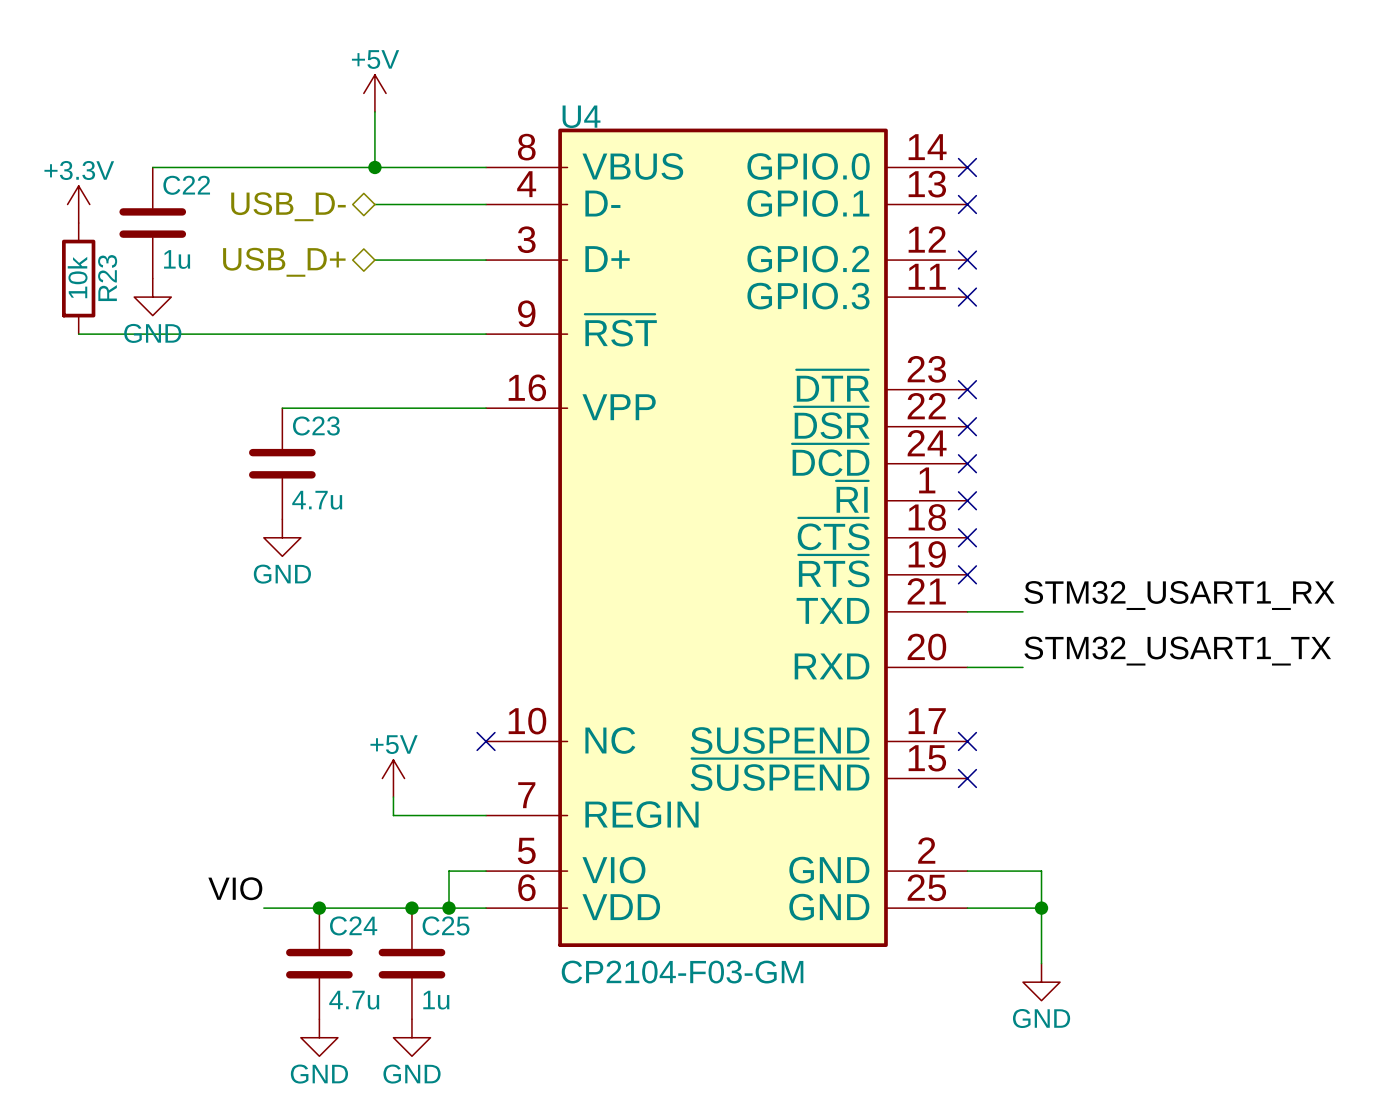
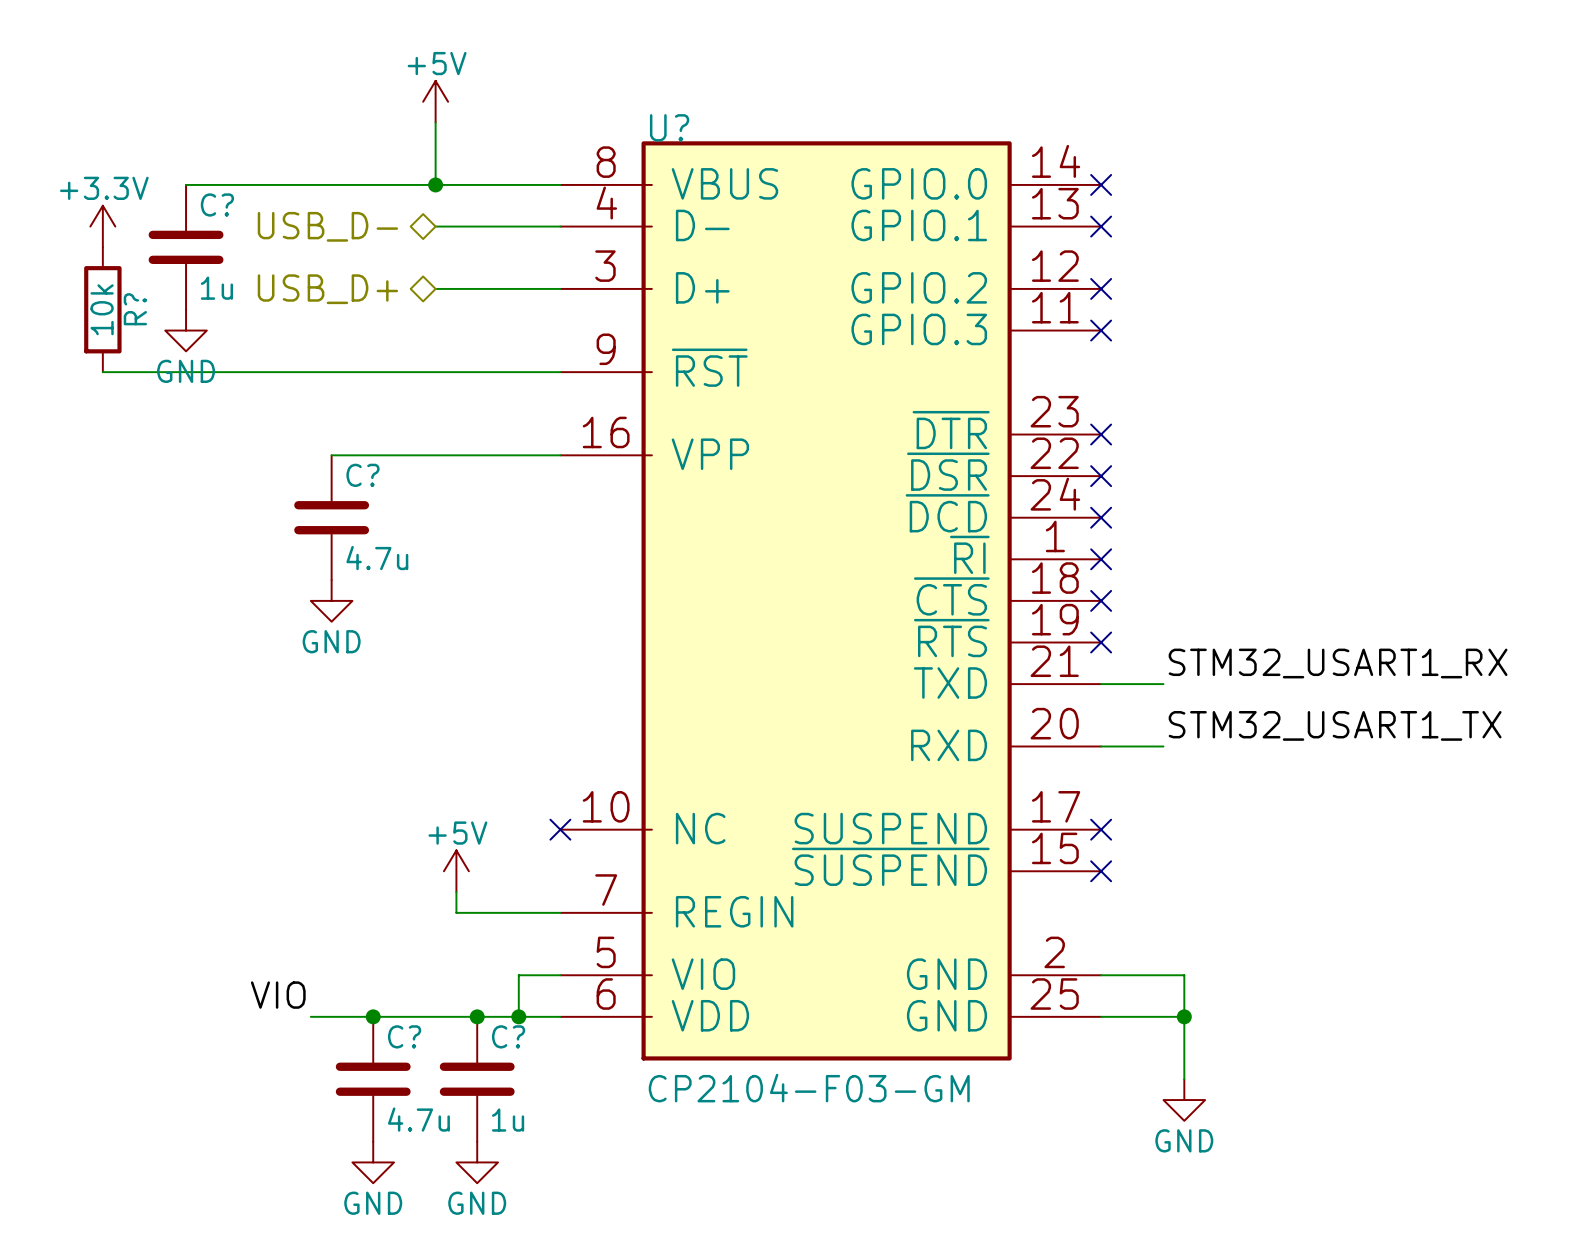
U4 name: U4 (581, 116) -> U? (669, 127)
C22 name: C22 (186, 185) -> C? (217, 204)
R23 name: R23 (107, 278) -> R? (135, 309)
C23 name: C23 (316, 426) -> C? (362, 475)
C24 name: C24 (353, 925) -> C? (404, 1036)
C25 name: C25 (446, 925) -> C? (508, 1036)

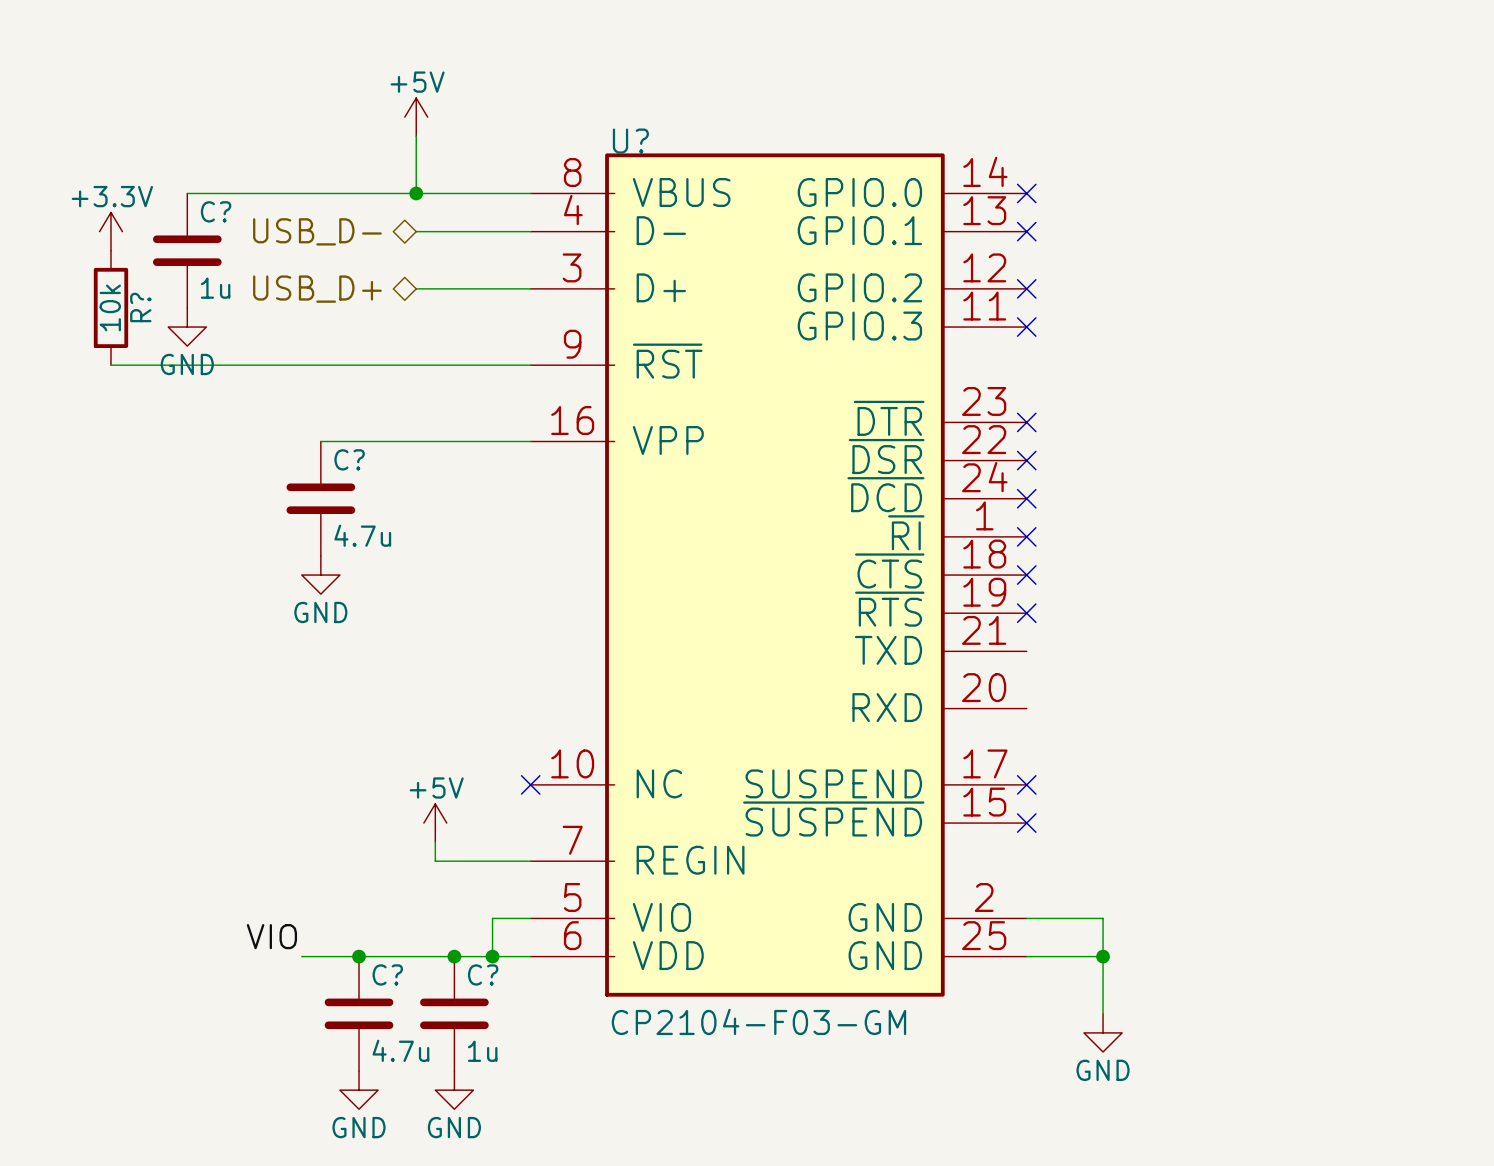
label: STM32_USART1_RX (1338, 663) -> none
wire: (1101, 684) (1163, 684) -> none
label: STM32_USART1_TX (1335, 725) -> none
wire: (1101, 746) (1163, 746) -> none

